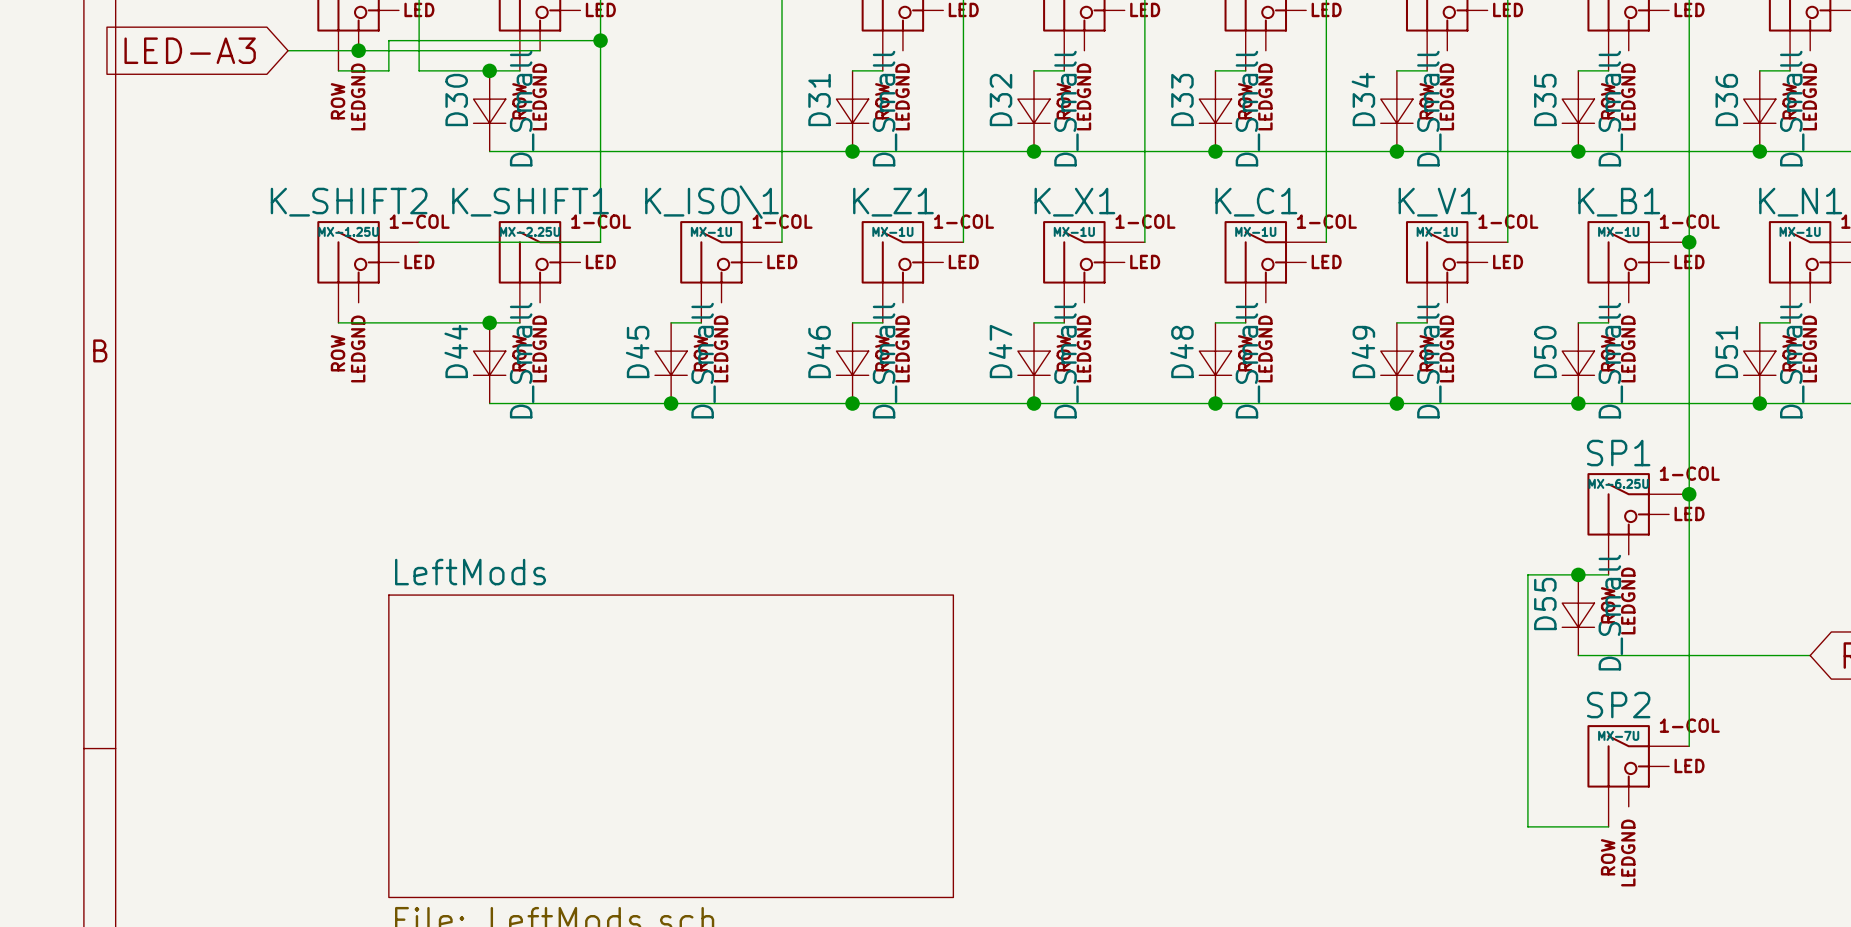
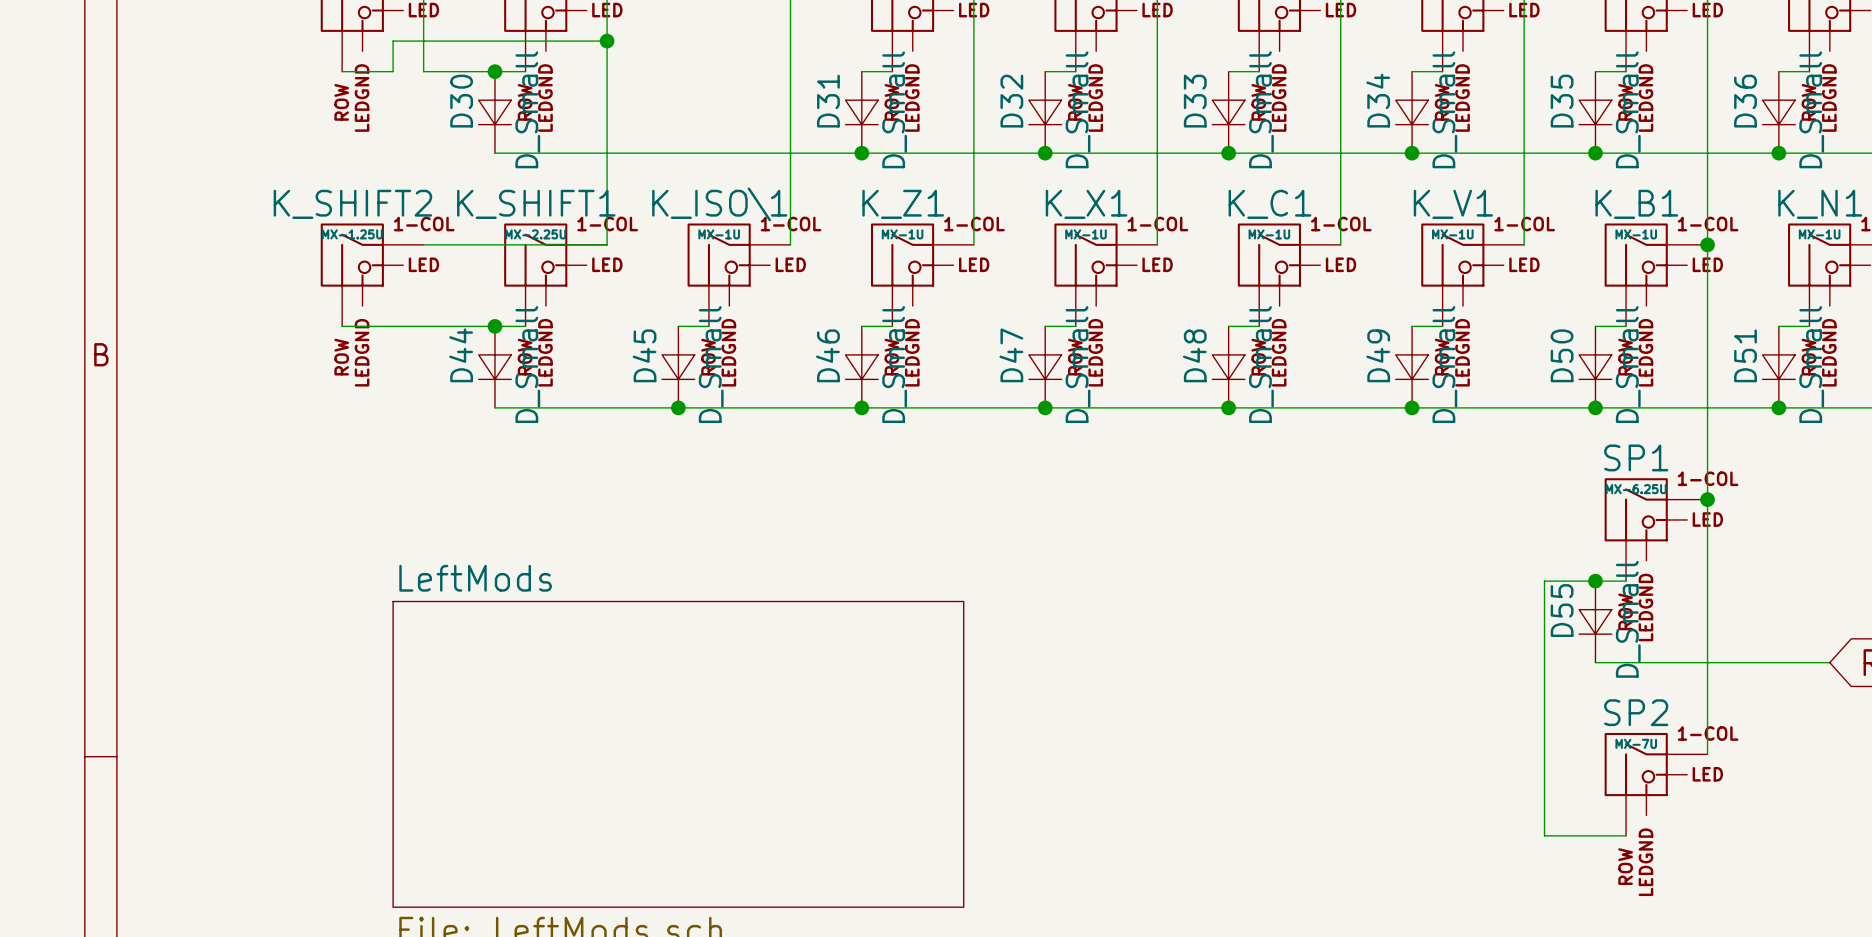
global label: LED-A3 (190, 50) -> none
wire: (288, 50) (540, 50) -> none
junction: (358, 50) -> none

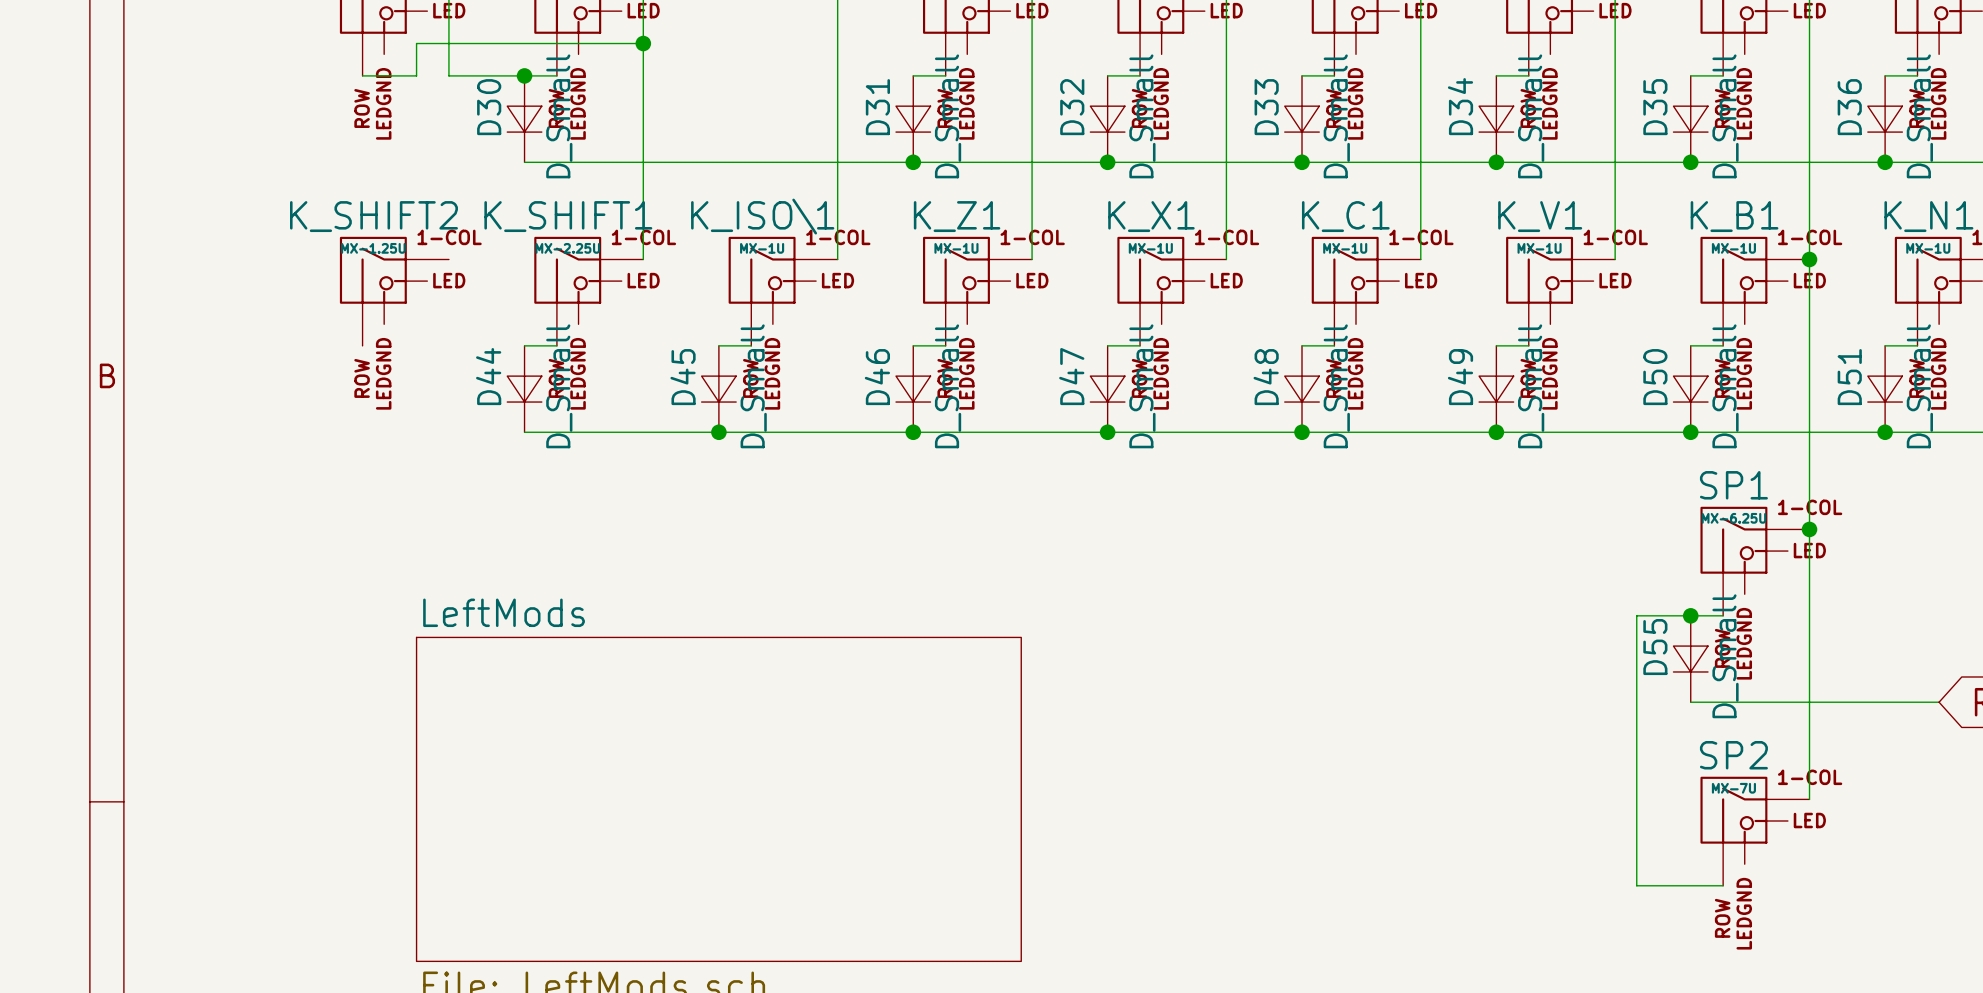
wire: (423, 244) (607, 244) -> none
wire: (342, 326) (494, 326) -> none
junction: (494, 326) -> none

